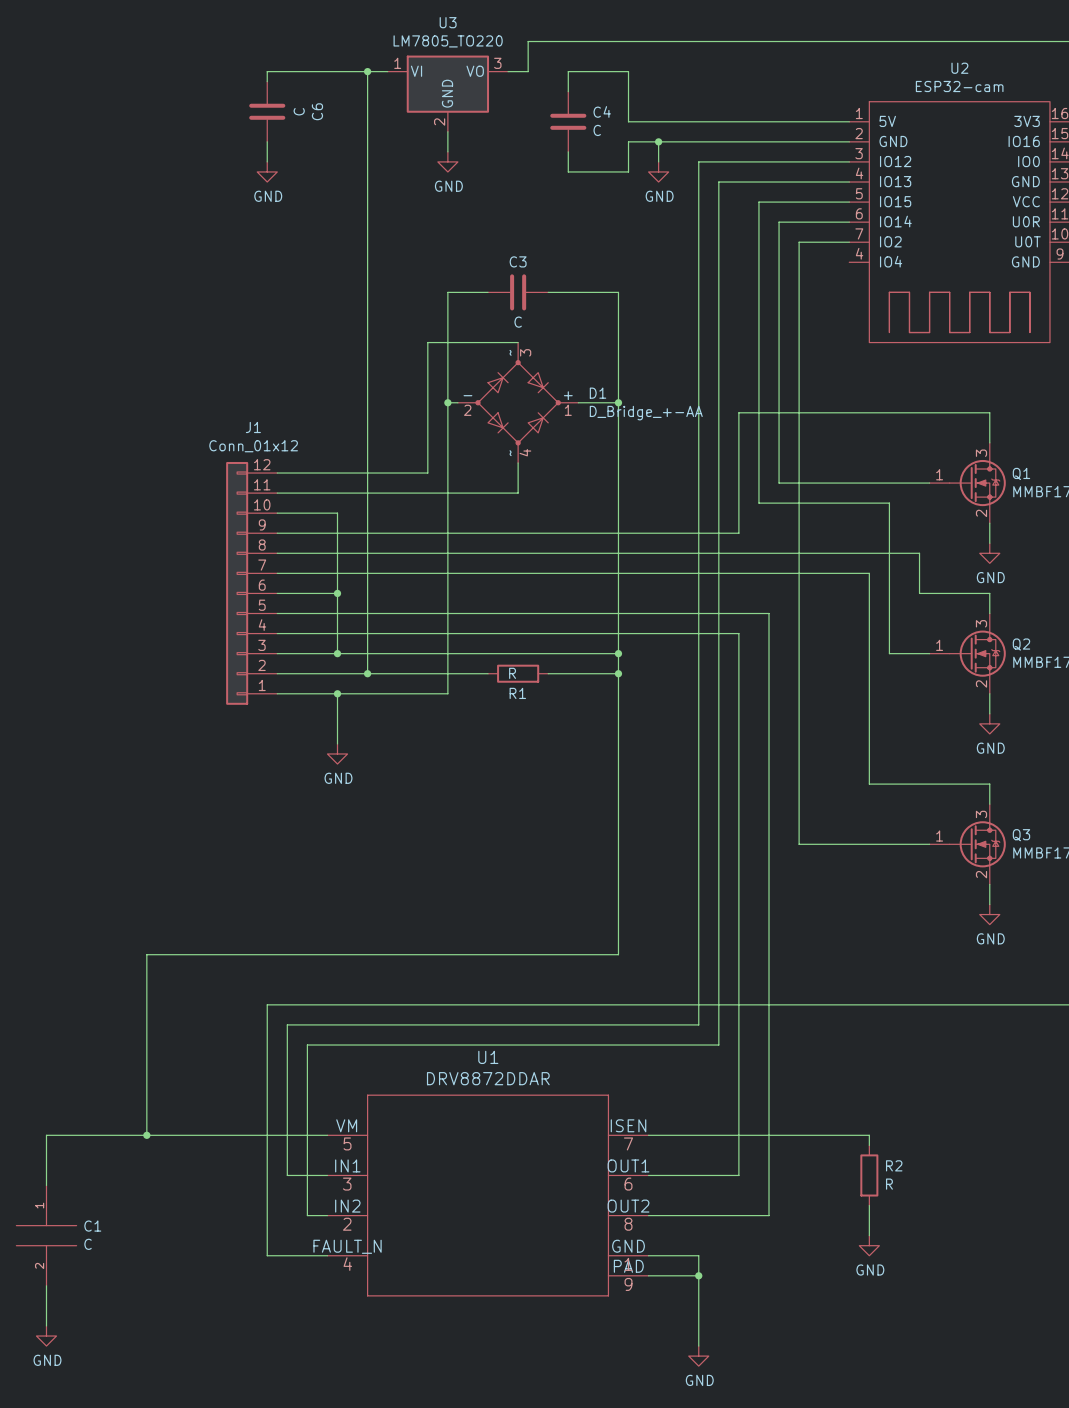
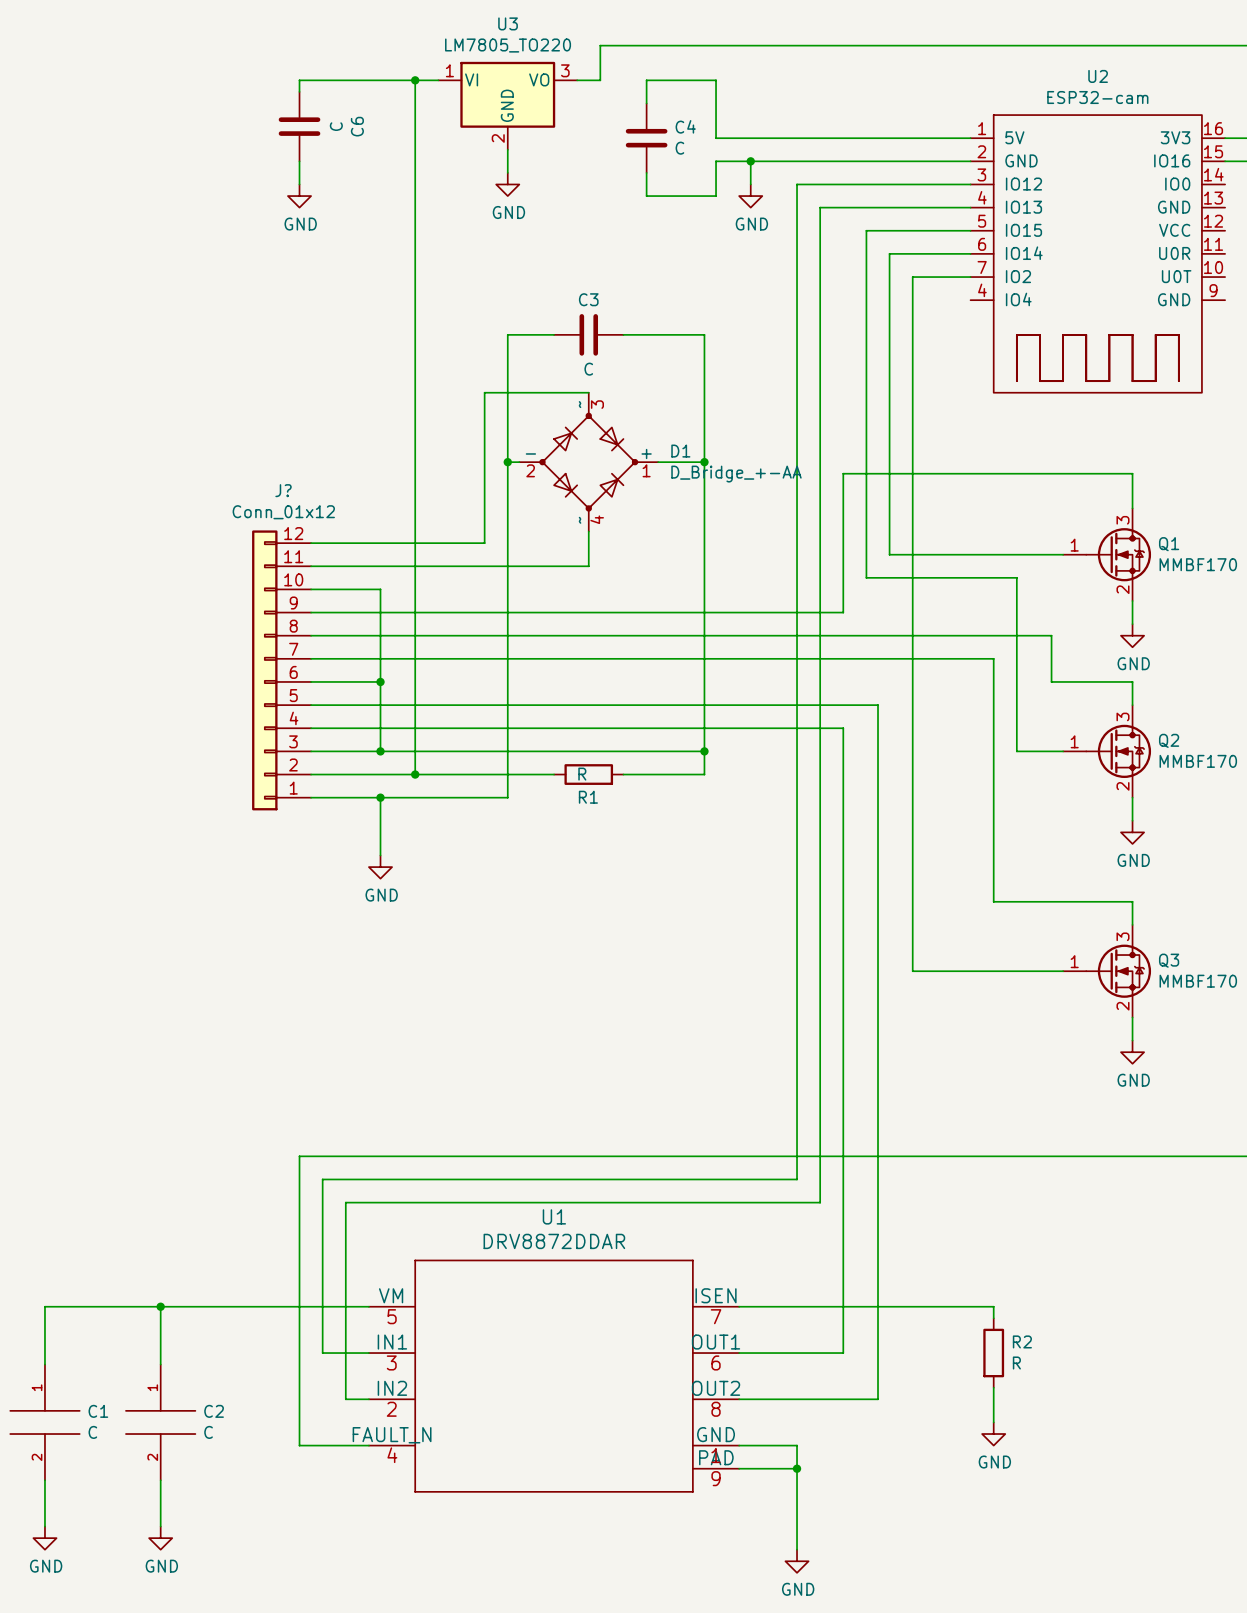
J1 name: J1 (253, 427) -> J? (283, 490)
wire: (618, 673) (618, 954) (146, 954) (146, 1135) -> (160, 1364) (160, 1306)
junction: (618, 673) -> none
C2: none -> C (160, 1422)
wire: none -> (160, 1480) (160, 1526)
power symbol: none -> GND (160, 1538)

